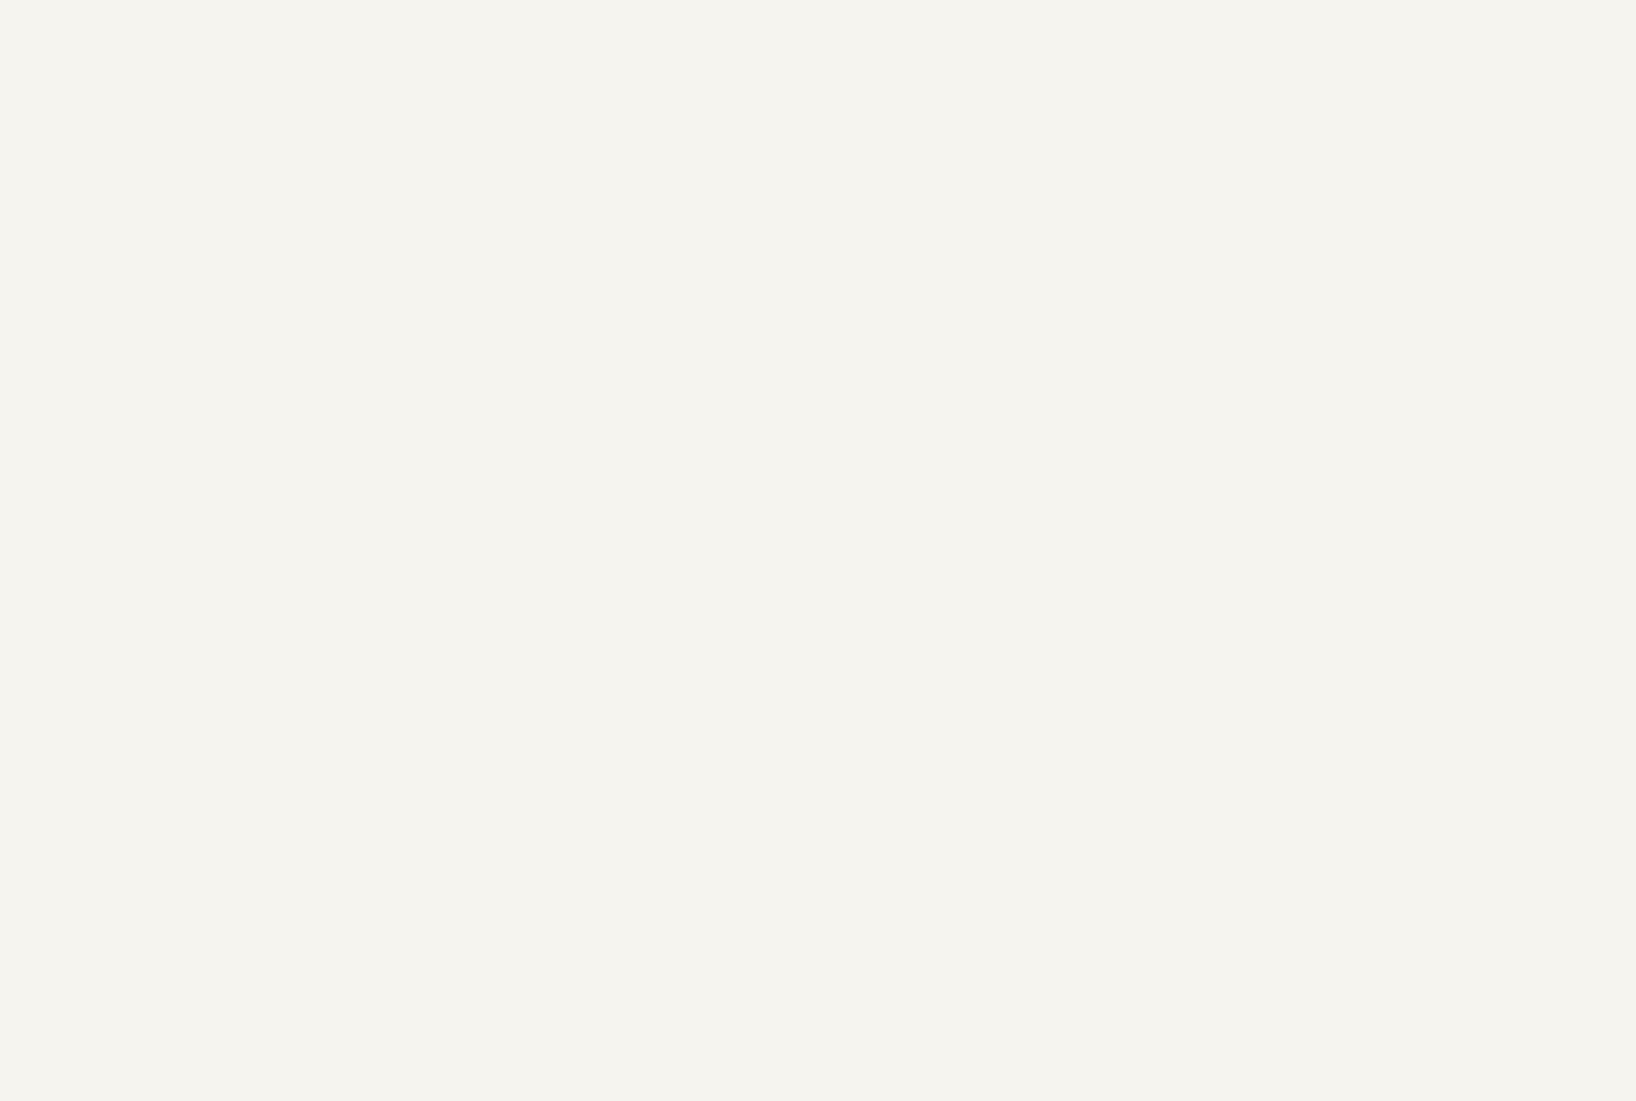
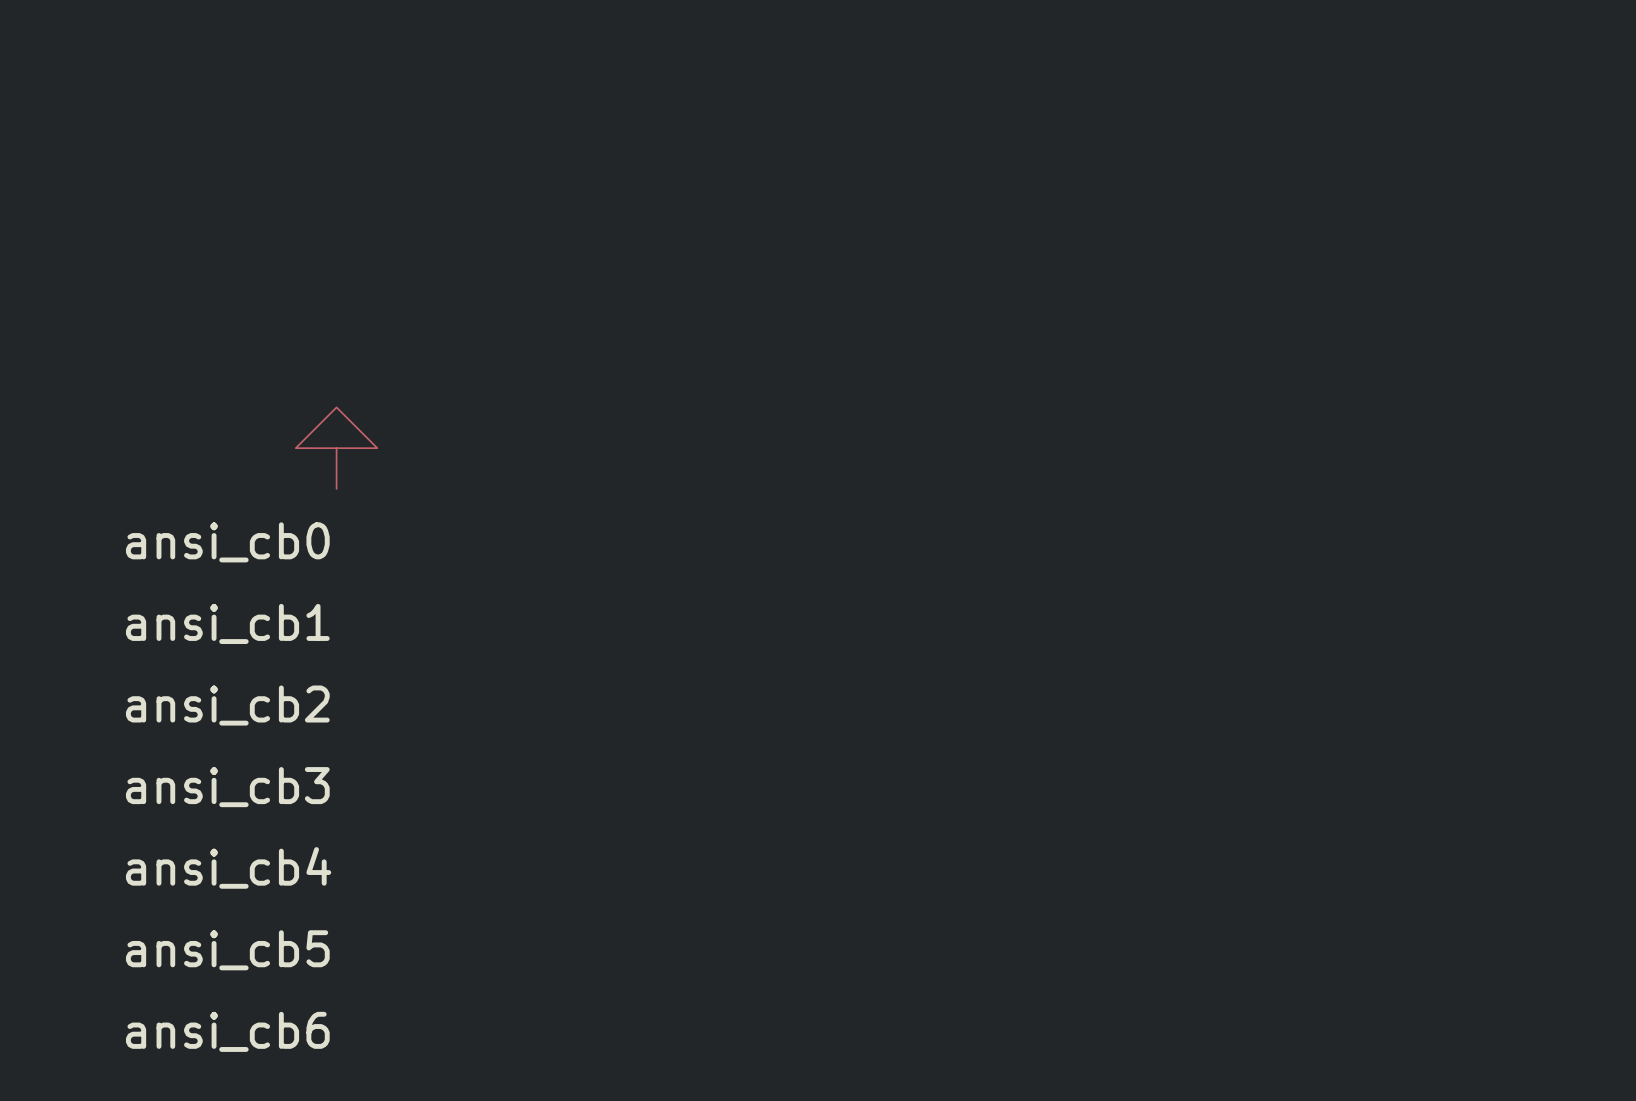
power symbol: none -> (336, 448)
label: none -> ansi_cb0 (227, 542)
label: none -> ansi_cb1 (227, 623)
label: none -> ansi_cb2 (227, 705)
label: none -> ansi_cb3 (227, 787)
label: none -> ansi_cb4 (228, 867)
label: none -> ansi_cb5 (227, 950)
label: none -> ansi_cb6 (227, 1031)

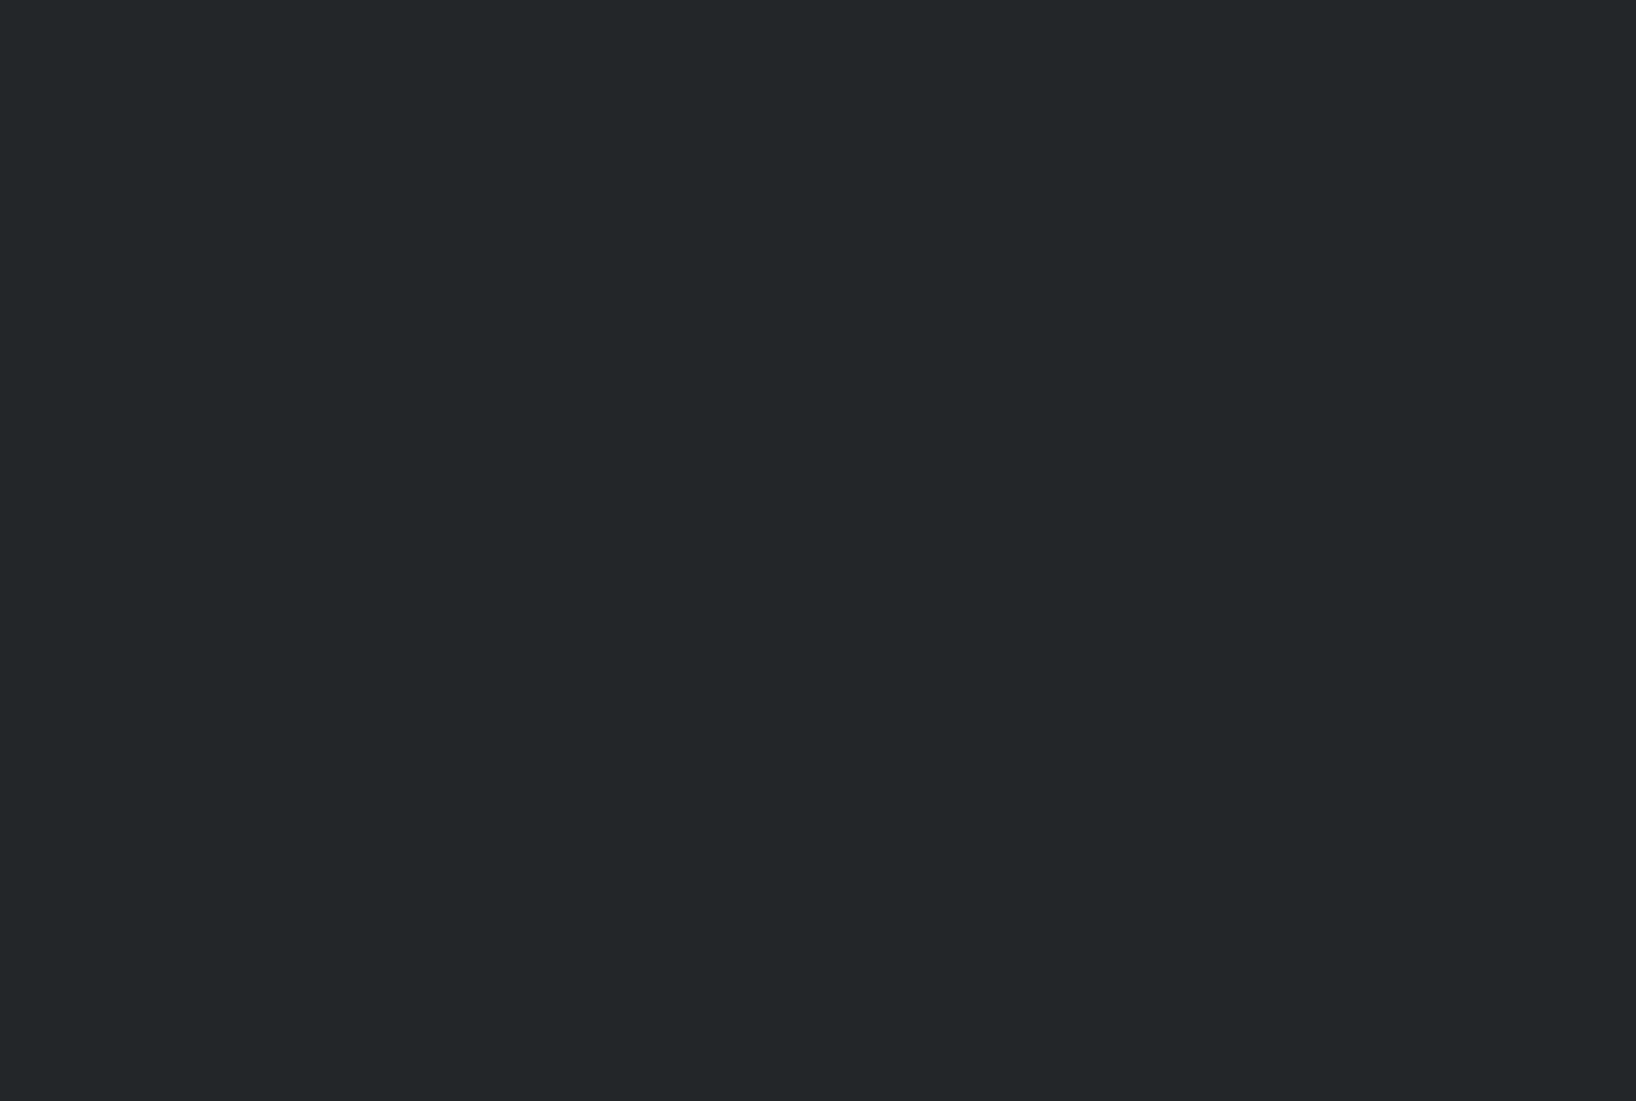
power symbol: (336, 448) -> none
label: ansi_cb0 (227, 542) -> none
label: ansi_cb1 (227, 623) -> none
label: ansi_cb2 (227, 705) -> none
label: ansi_cb3 (227, 787) -> none
label: ansi_cb4 (228, 867) -> none
label: ansi_cb5 (227, 950) -> none
label: ansi_cb6 (227, 1031) -> none

